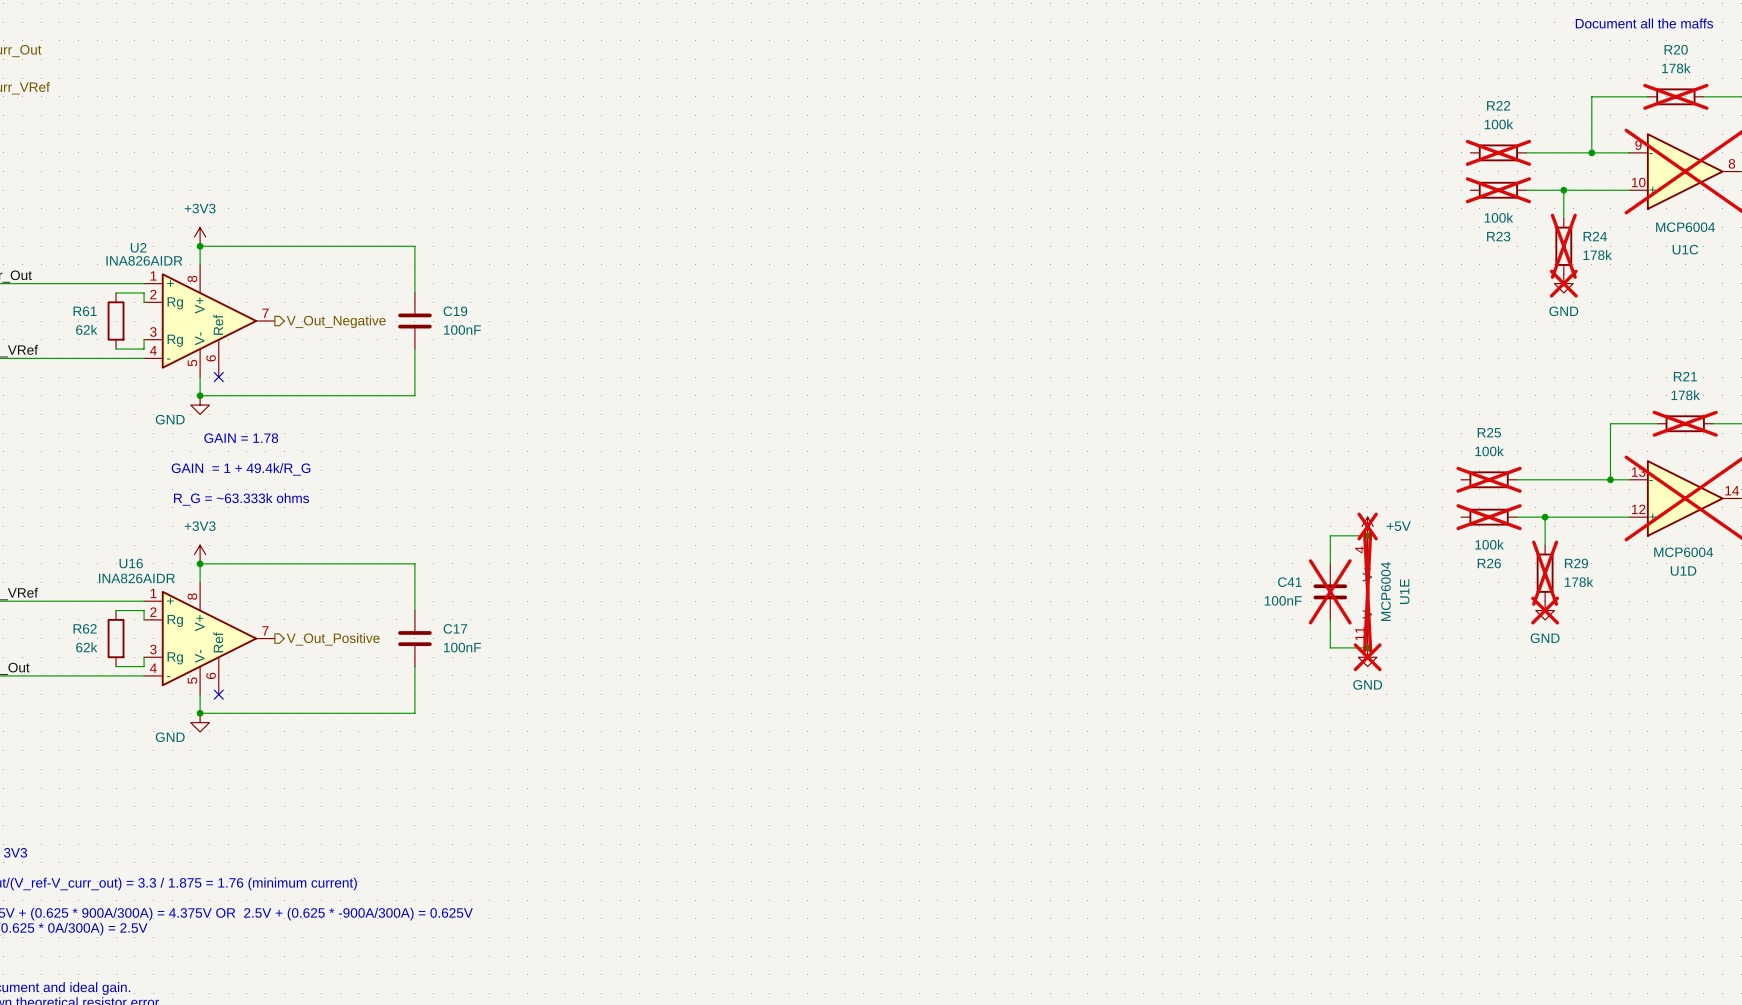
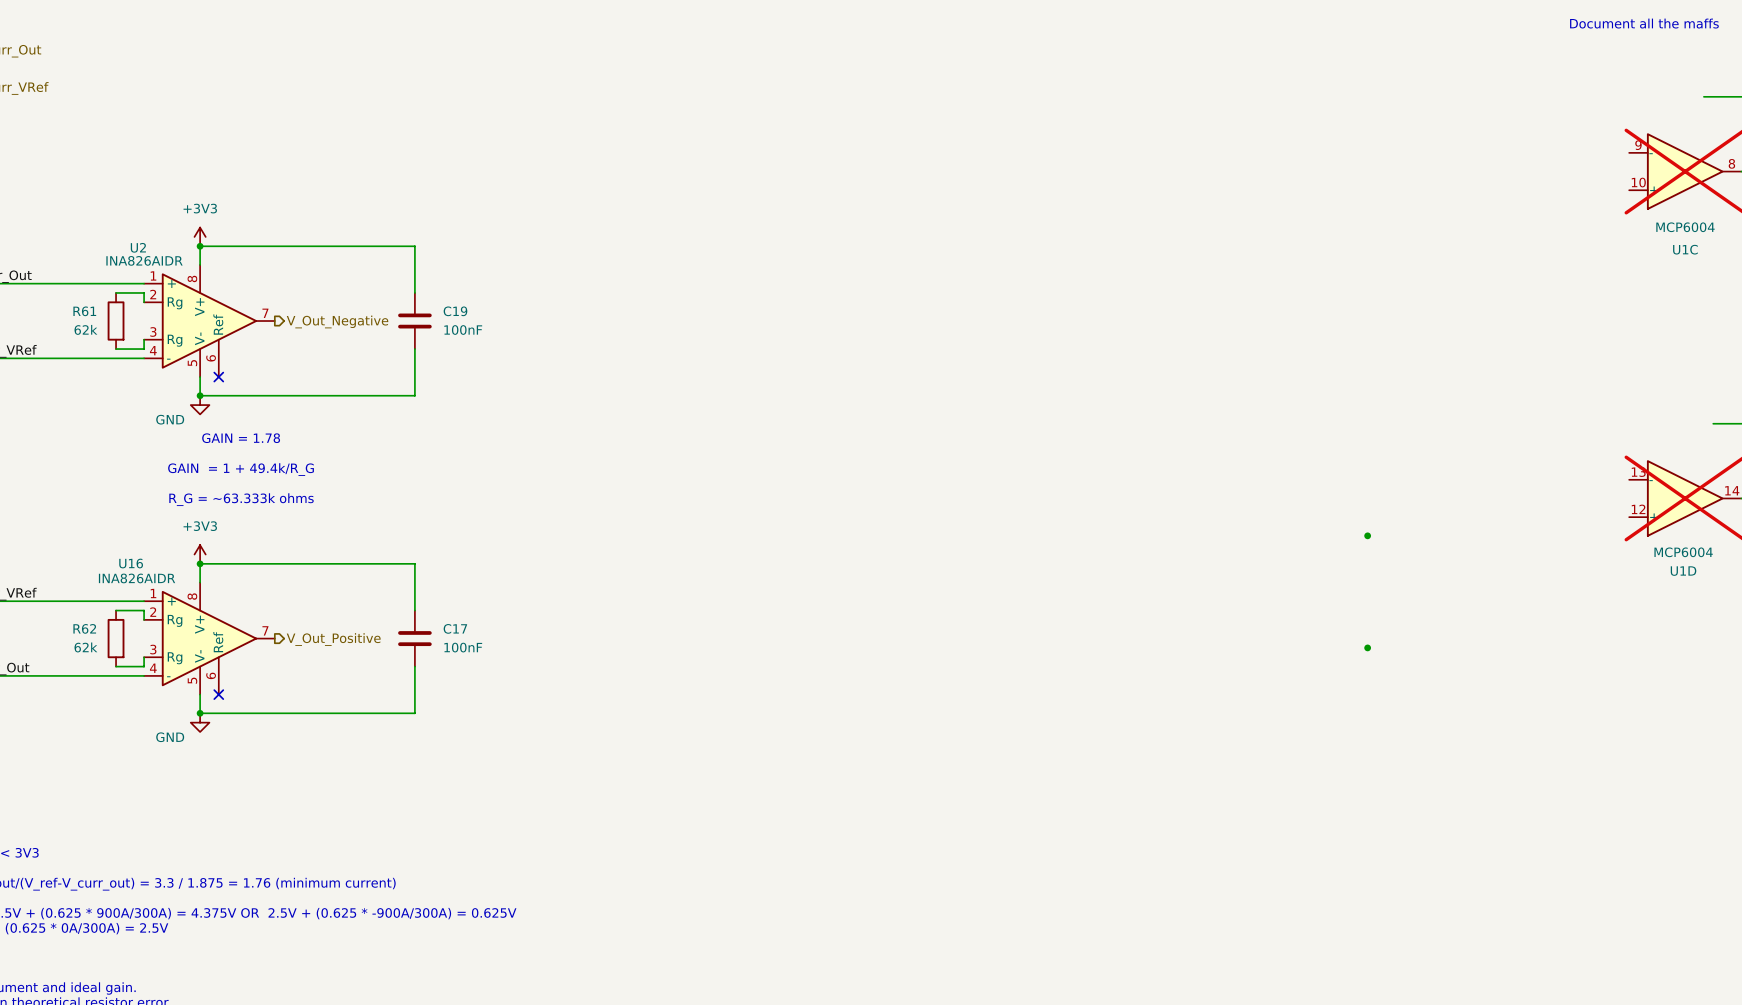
wire: (1647, 96) (1591, 96) (1591, 152) -> none
R20: 178k (1675, 96) -> none
R22: 100k (1498, 152) -> none
wire: (1526, 152) (1629, 152) -> none
junction: (1591, 152) -> none
R23: 100k (1498, 190) -> none
wire: (1526, 190) (1629, 190) -> none
wire: (1563, 190) (1563, 218) -> none
junction: (1563, 190) -> none
R24: 178k (1563, 246) -> none
power symbol: GND (1563, 283) -> none
wire: (1657, 423) (1610, 423) (1610, 479) -> none
R21: 178k (1685, 423) -> none
R25: 100k (1489, 479) -> none
wire: (1517, 479) (1629, 479) -> none
junction: (1610, 479) -> none
R26: 100k (1489, 517) -> none
wire: (1517, 517) (1629, 517) -> none
wire: (1545, 517) (1545, 545) -> none
junction: (1545, 517) -> none
power symbol: +5V (1367, 526) -> none
wire: (1367, 535) (1330, 535) (1330, 563) -> none
R29: 178k (1545, 573) -> none
C41: 100nF (1330, 591) -> none
U1E: MCP6004 (1367, 591) -> none
power symbol: GND (1545, 610) -> none
wire: (1330, 619) (1330, 647) (1367, 647) -> none
power symbol: GND (1367, 657) -> none

